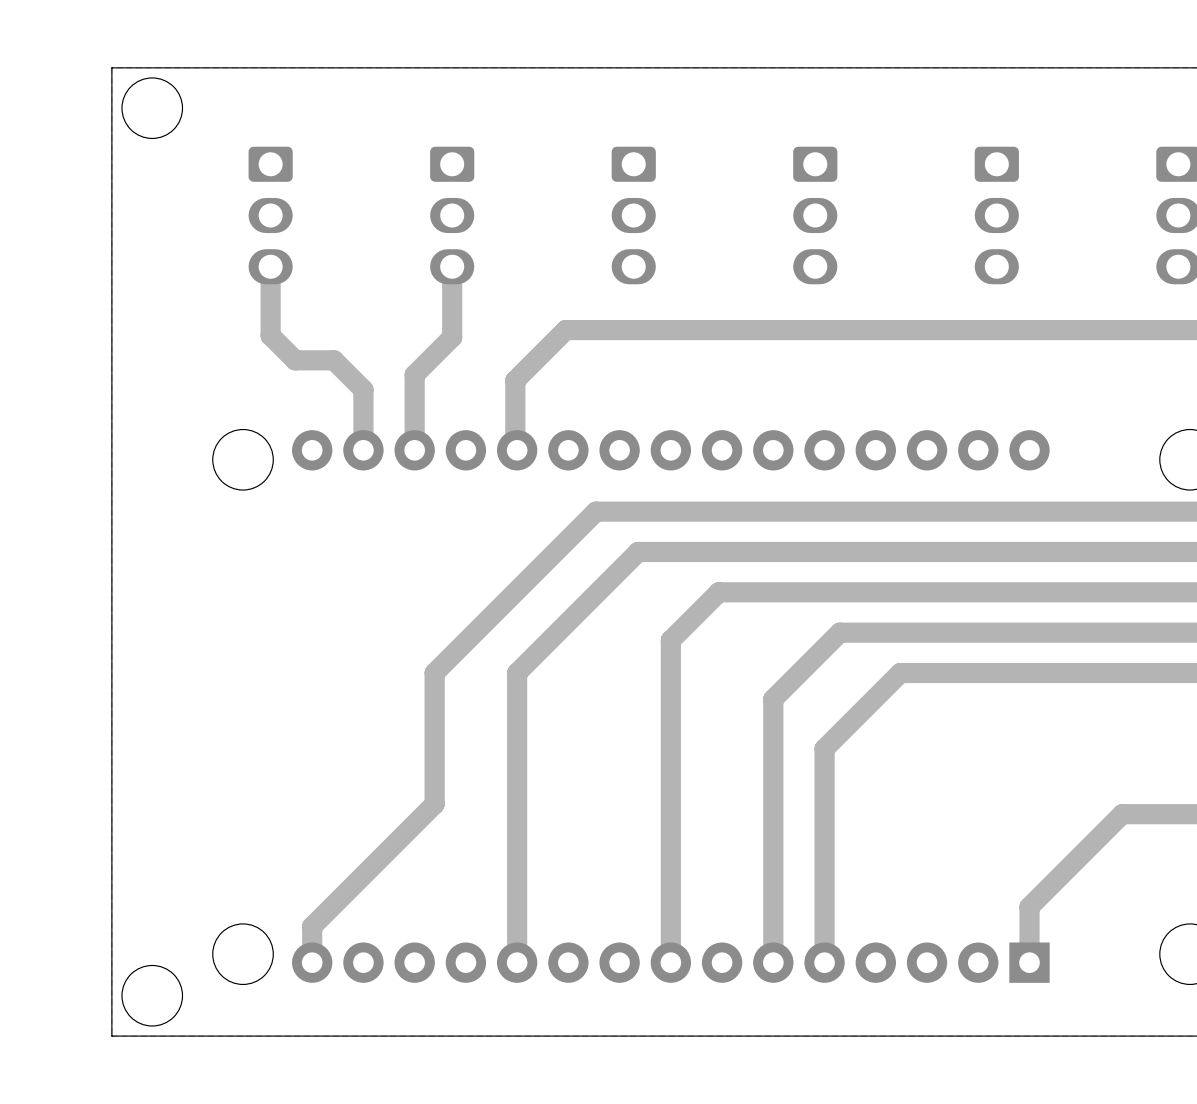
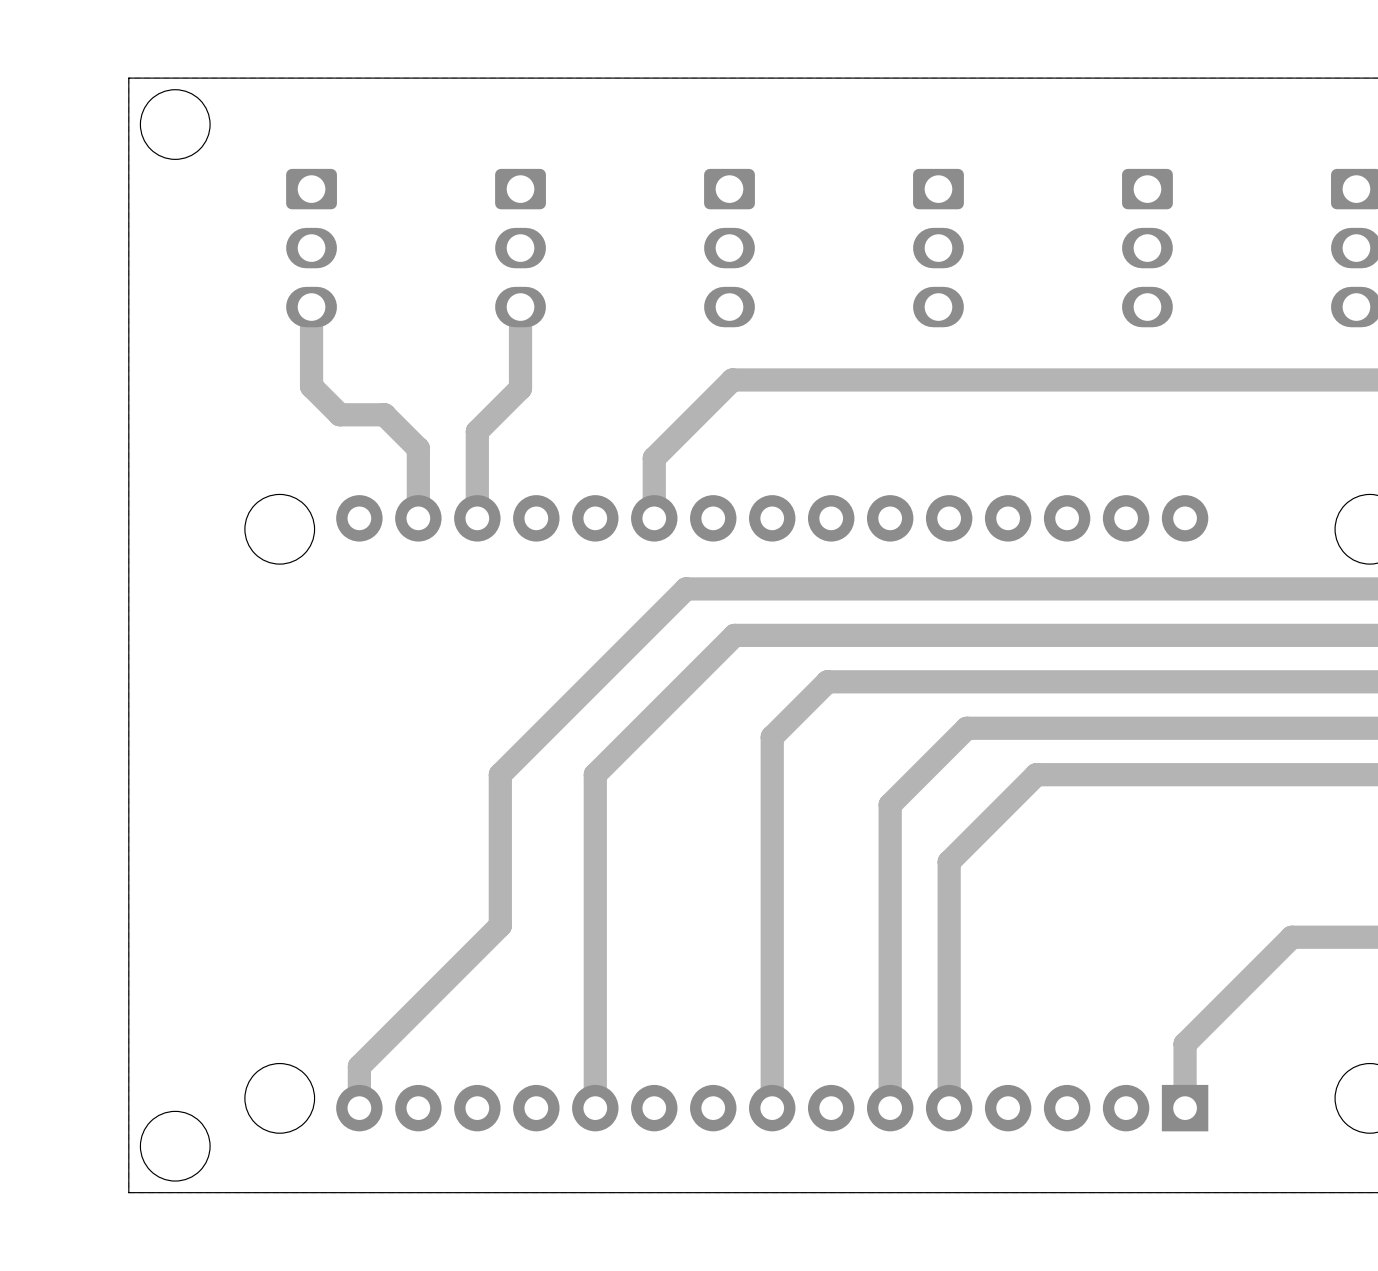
track: (636, 330) (565, 330) (515, 380) (515, 448) (517, 450) -> (732, 379) (654, 458) (654, 518)

